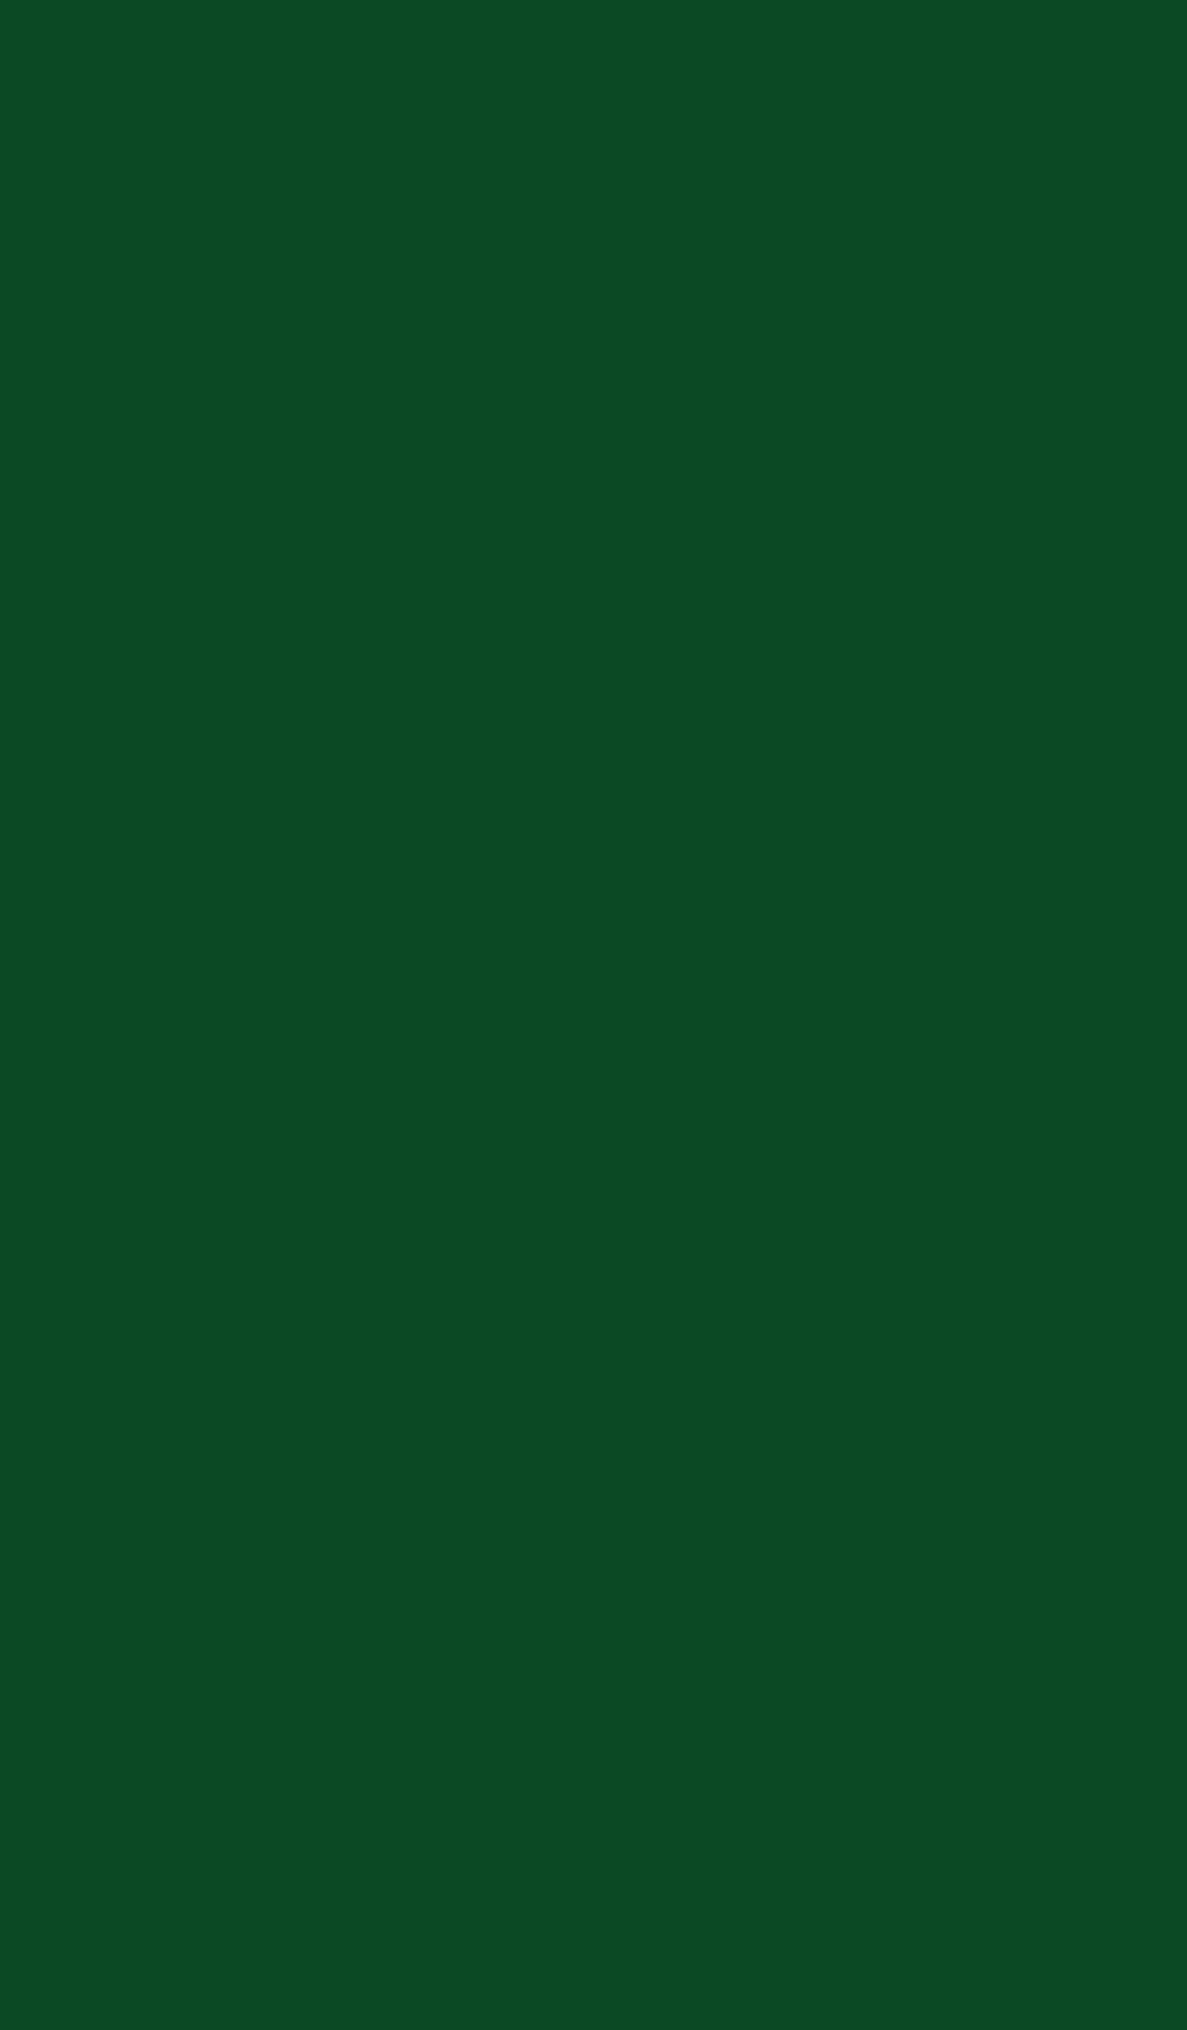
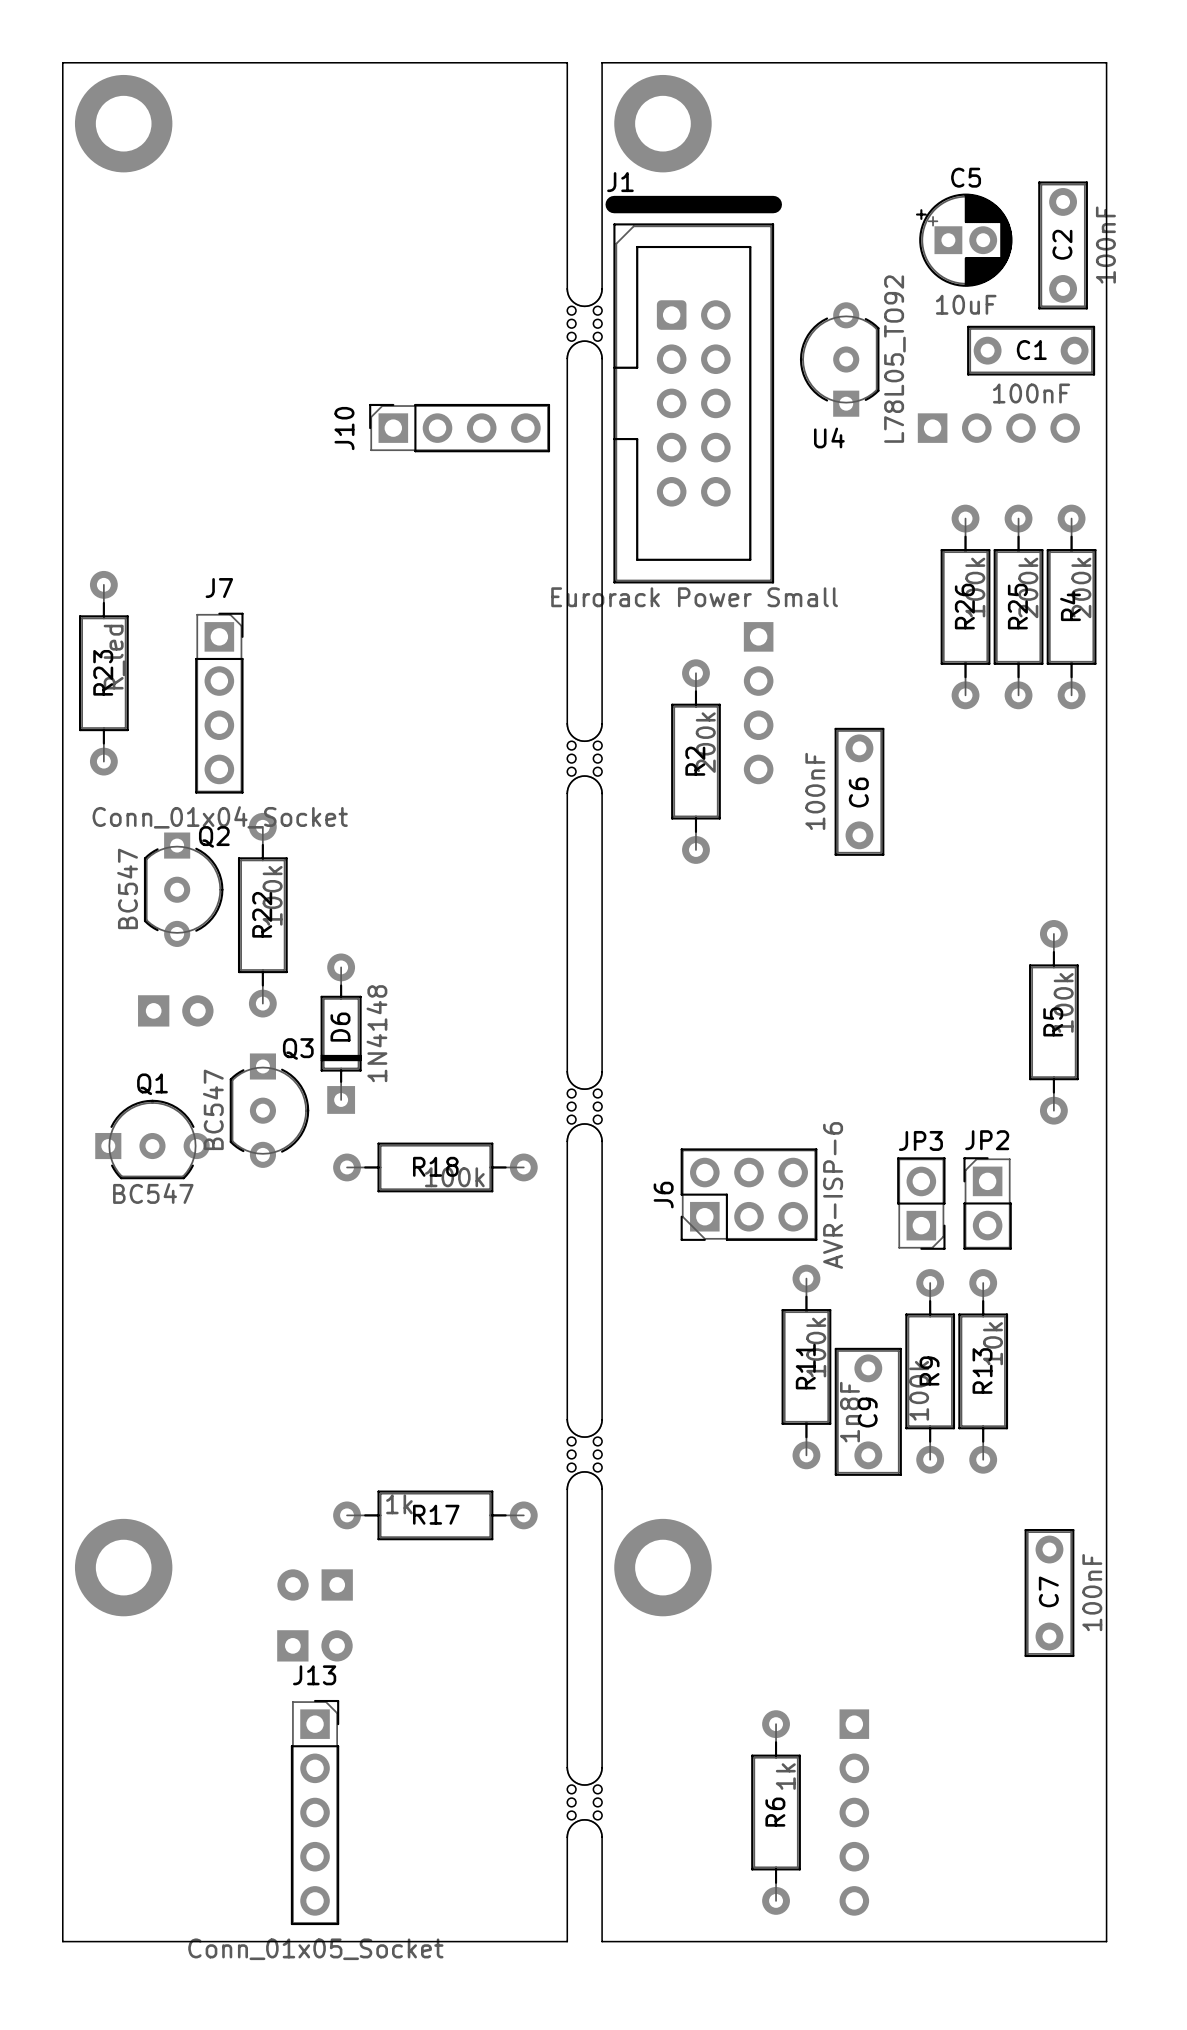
part: none -> (123, 123)
part: none -> (662, 123)
C5: none -> 10uF (964, 240)
C2: none -> 100nF (1063, 245)
board edge: none -> (567, 288) (567, 62) (62, 62) (62, 1941) (567, 1941) (567, 1837)
board edge: none -> (602, 288) (602, 62) (1106, 62) (1106, 1941) (602, 1941) (602, 1837)
part: none -> (584, 323)
C1: none -> 100nF (1031, 350)
board edge: none -> (567, 358) (567, 723)
board edge: none -> (602, 358) (602, 723)
U4: none -> L78L05_TO92 (839, 359)
J1: none -> Eurorack Power Small (693, 389)
J10: none -> (459, 428)
part: none -> (998, 428)
R26: none -> 100k (965, 606)
R25: none -> 200k (1018, 606)
R4: none -> 200k (1071, 606)
R23: none -> R_led (103, 673)
J7: none -> Conn_01x04_Socket (219, 703)
part: none -> (758, 703)
part: none -> (584, 758)
R2: none -> 200k (695, 761)
C6: none -> 100nF (859, 791)
board edge: none -> (567, 793) (567, 1071)
board edge: none -> (602, 793) (602, 1071)
Q2: none -> BC547 (183, 889)
R22: none -> 100k (262, 915)
part: none -> (175, 1010)
R5: none -> 100k (1053, 1022)
D6: none -> 1N4148 (341, 1033)
part: none -> (584, 1106)
Q3: none -> BC547 (269, 1110)
Q1: none -> BC547 (152, 1139)
board edge: none -> (567, 1141) (567, 1419)
board edge: none -> (602, 1141) (602, 1419)
R18: none -> 100k (435, 1167)
J6: none -> AVR-ISP-6 (749, 1194)
JP3: none -> (921, 1203)
JP2: none -> (987, 1203)
R11: none -> 100k (806, 1366)
R9: none -> 100k (930, 1371)
R13: none -> 10k (983, 1371)
C9: none -> 1n8F (868, 1411)
part: none -> (584, 1454)
board edge: none -> (567, 1489) (567, 1767)
board edge: none -> (602, 1489) (602, 1767)
R17: none -> 1k (435, 1515)
part: none -> (123, 1567)
part: none -> (662, 1567)
part: none -> (315, 1584)
C7: none -> 100nF (1049, 1593)
part: none -> (314, 1645)
part: none -> (584, 1802)
J13: none -> Conn_01x05_Socket (315, 1812)
R6: none -> 1k (776, 1812)
part: none -> (854, 1812)

